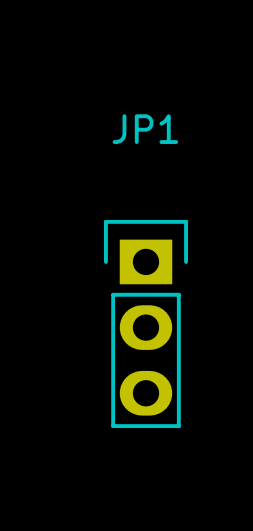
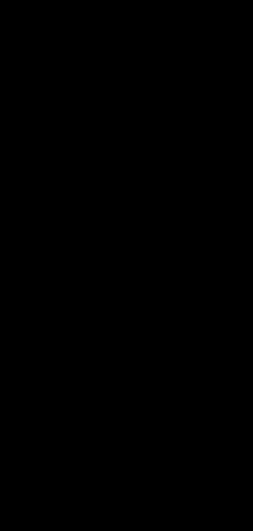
JP1: (145, 323) -> none

